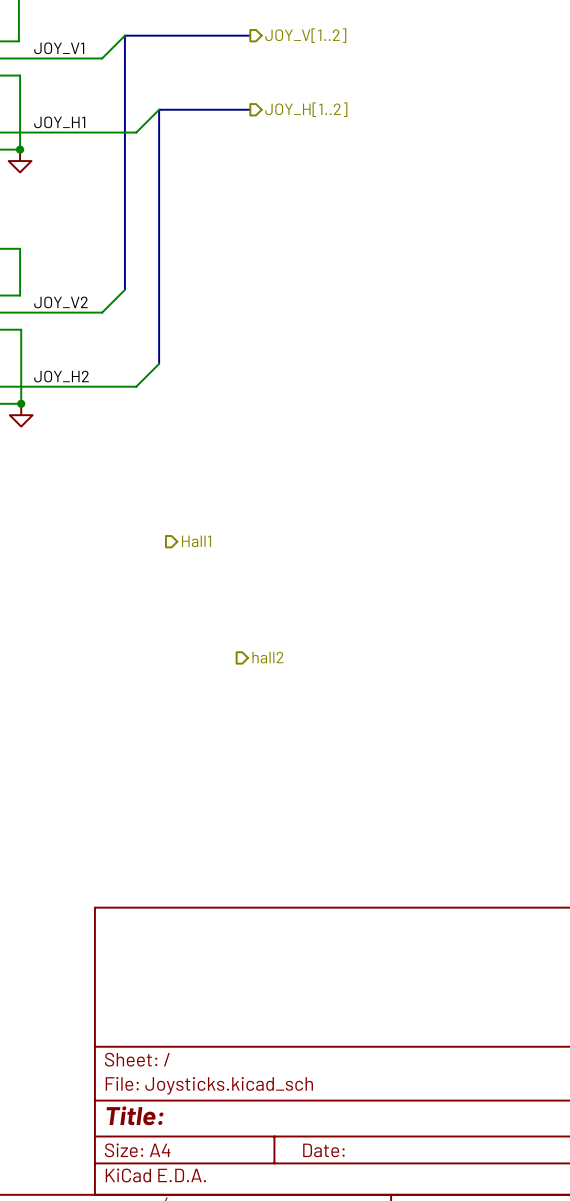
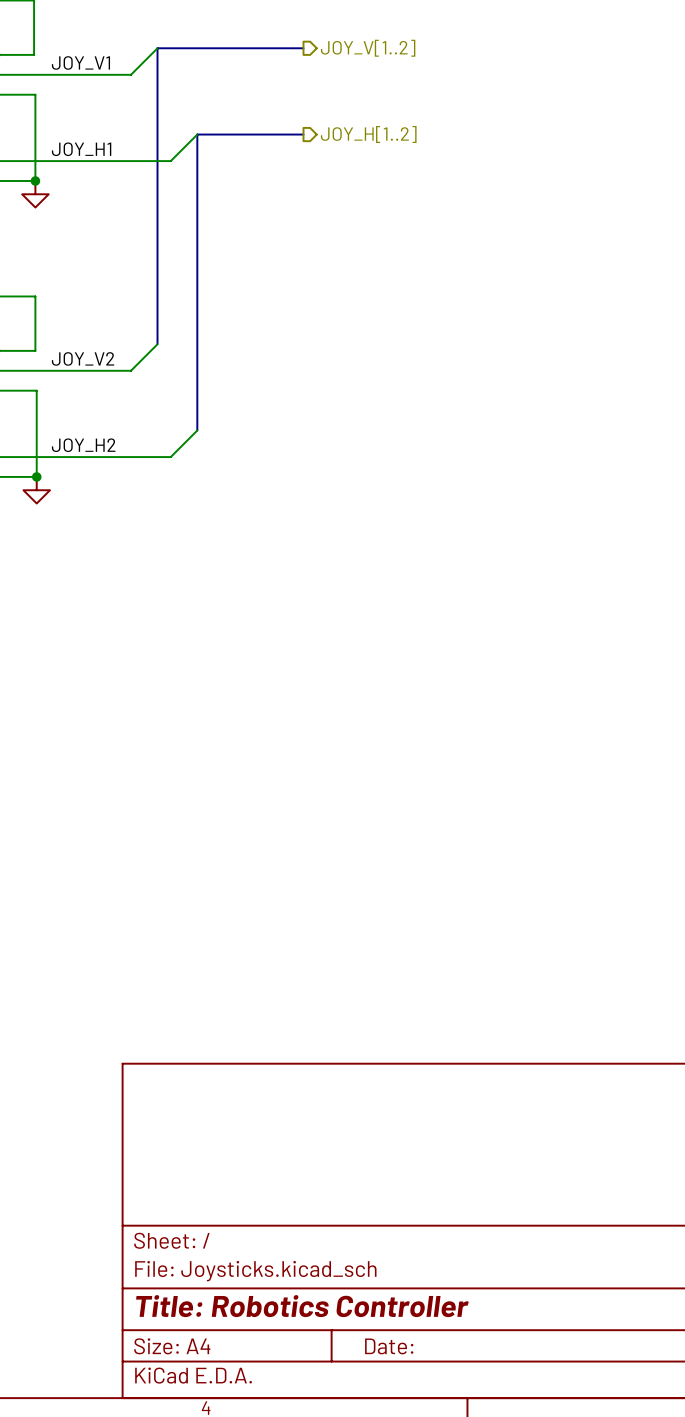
hierarchical label: Hall1 (196, 541) -> none
hierarchical label: hall2 (267, 657) -> none
title block: Title: (135, 1115) -> Title: Robotics Controller (302, 1306)

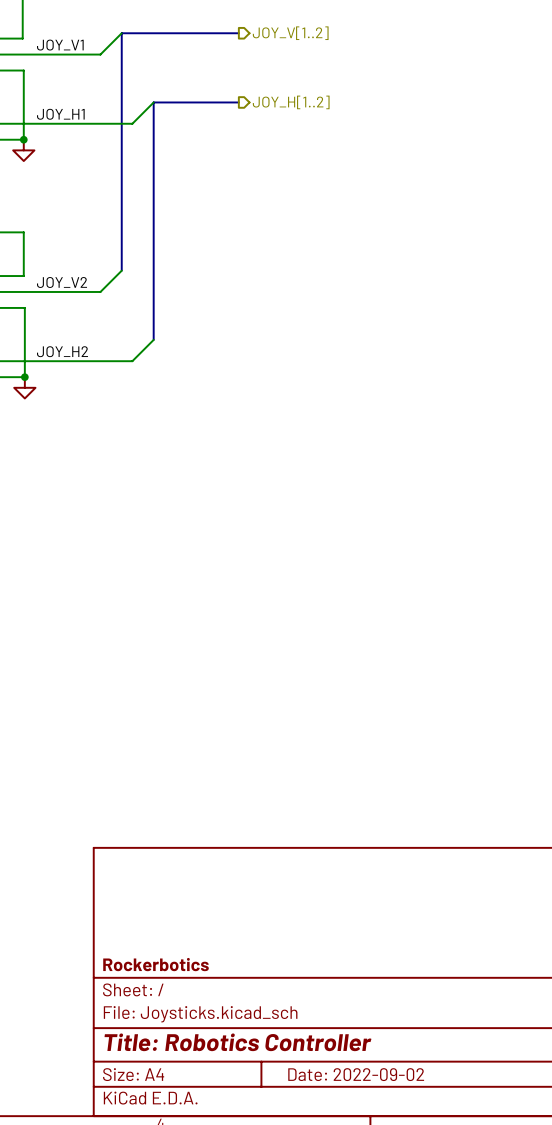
title block: none -> Rockerbotics (156, 964)
title block: Date: (389, 1346) -> Date: 2022-09-02 (356, 1074)

